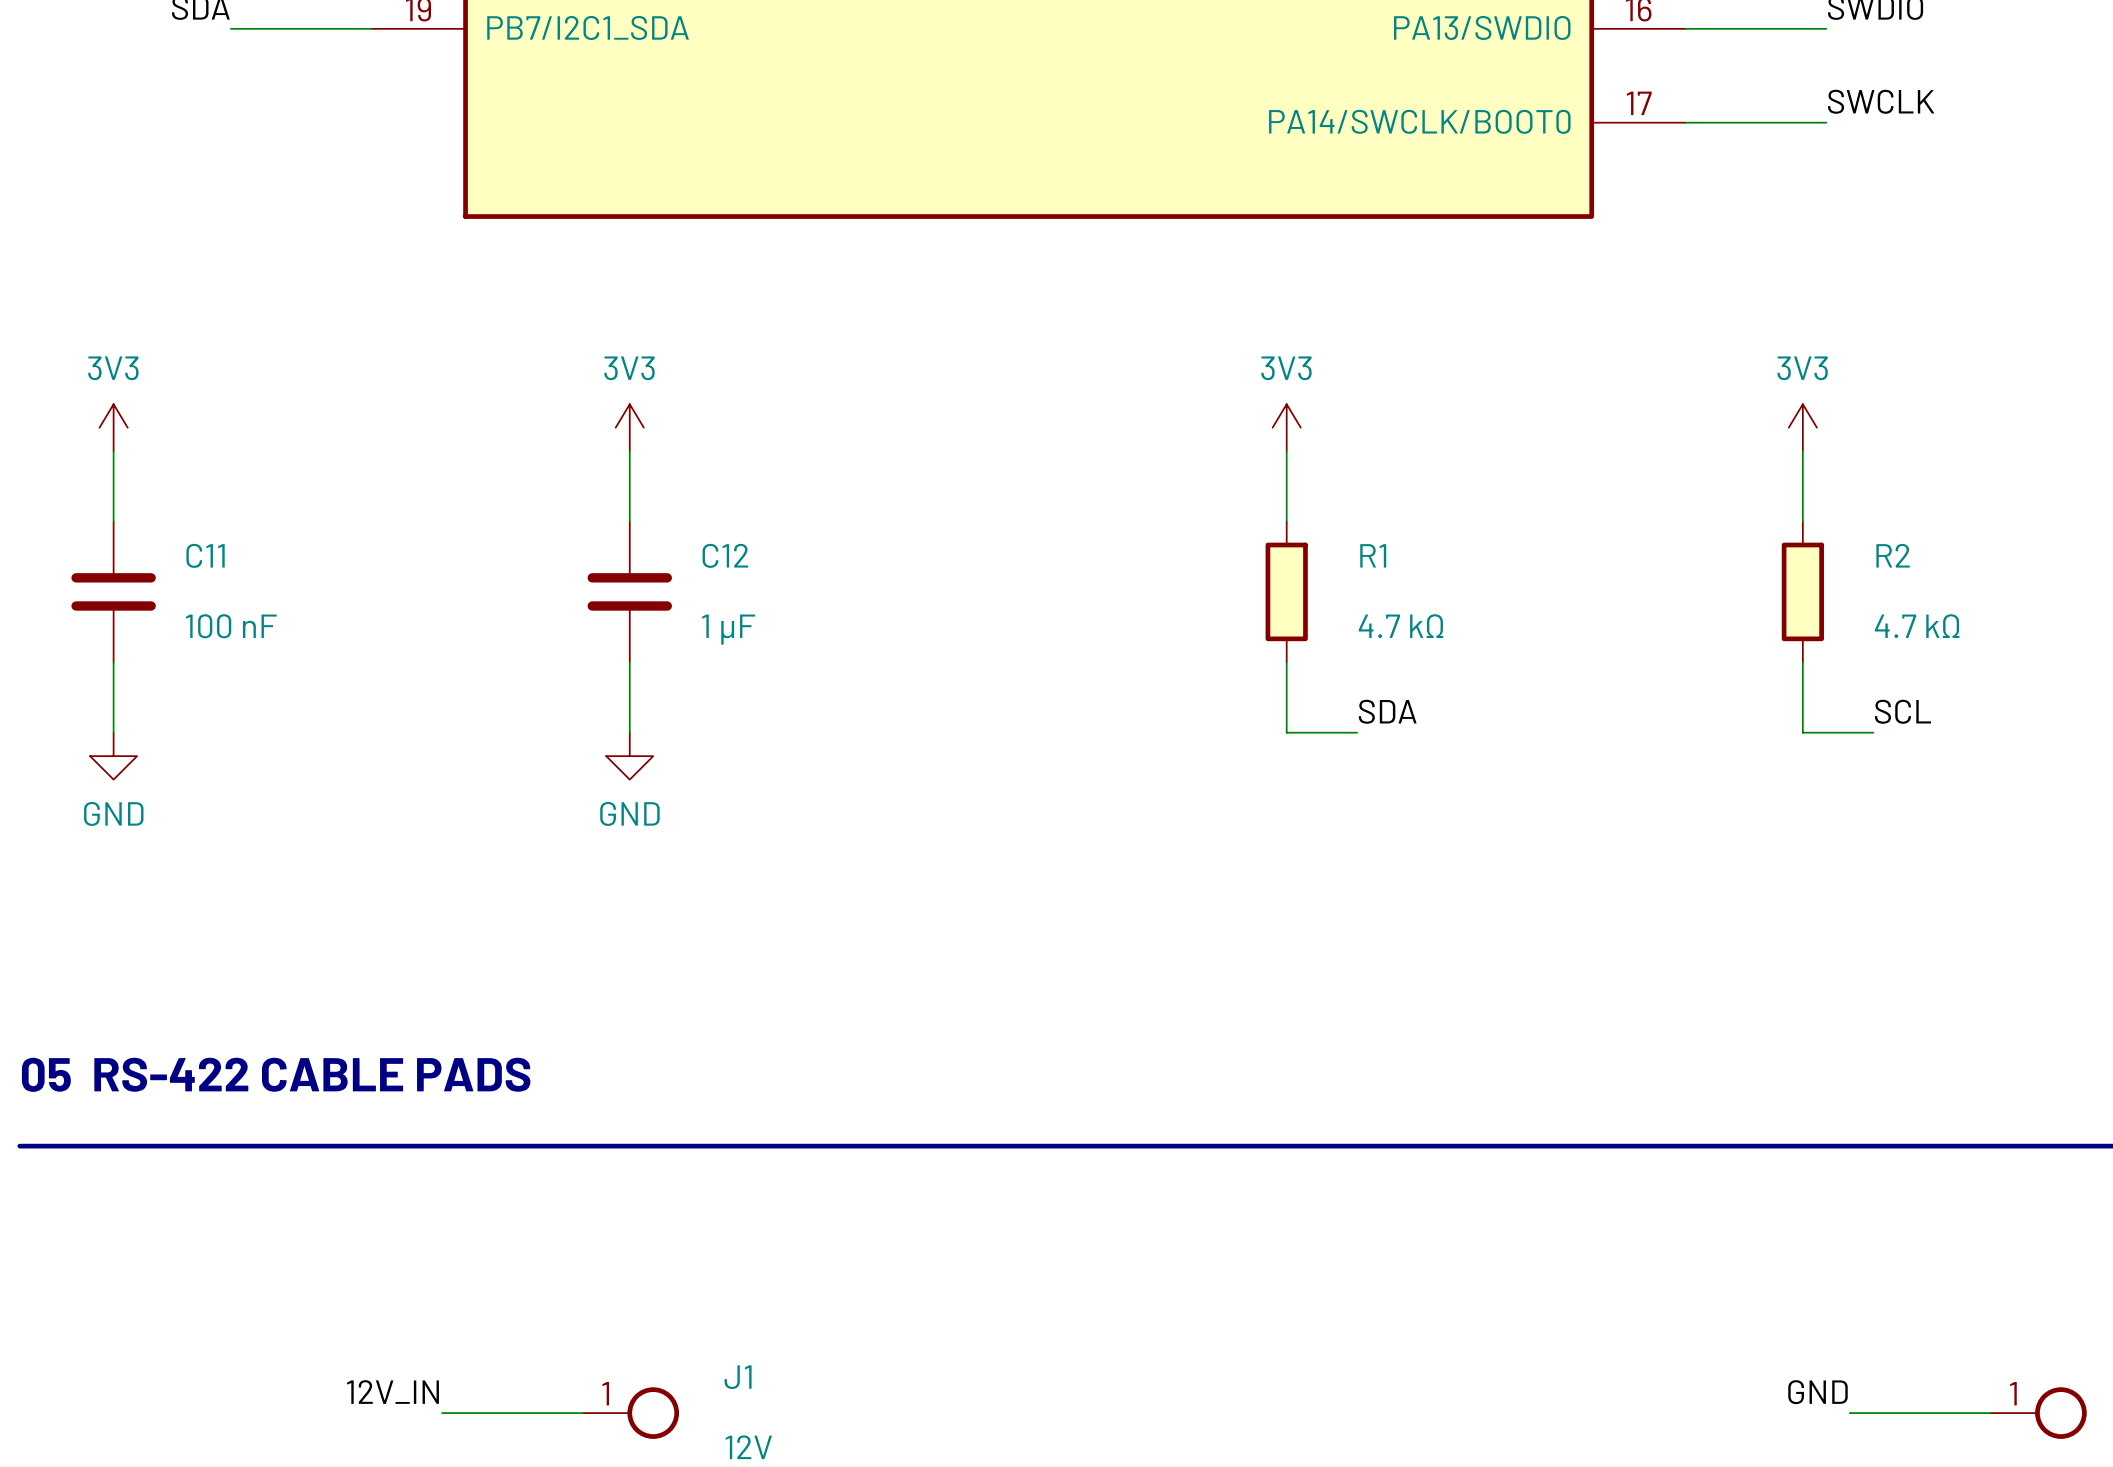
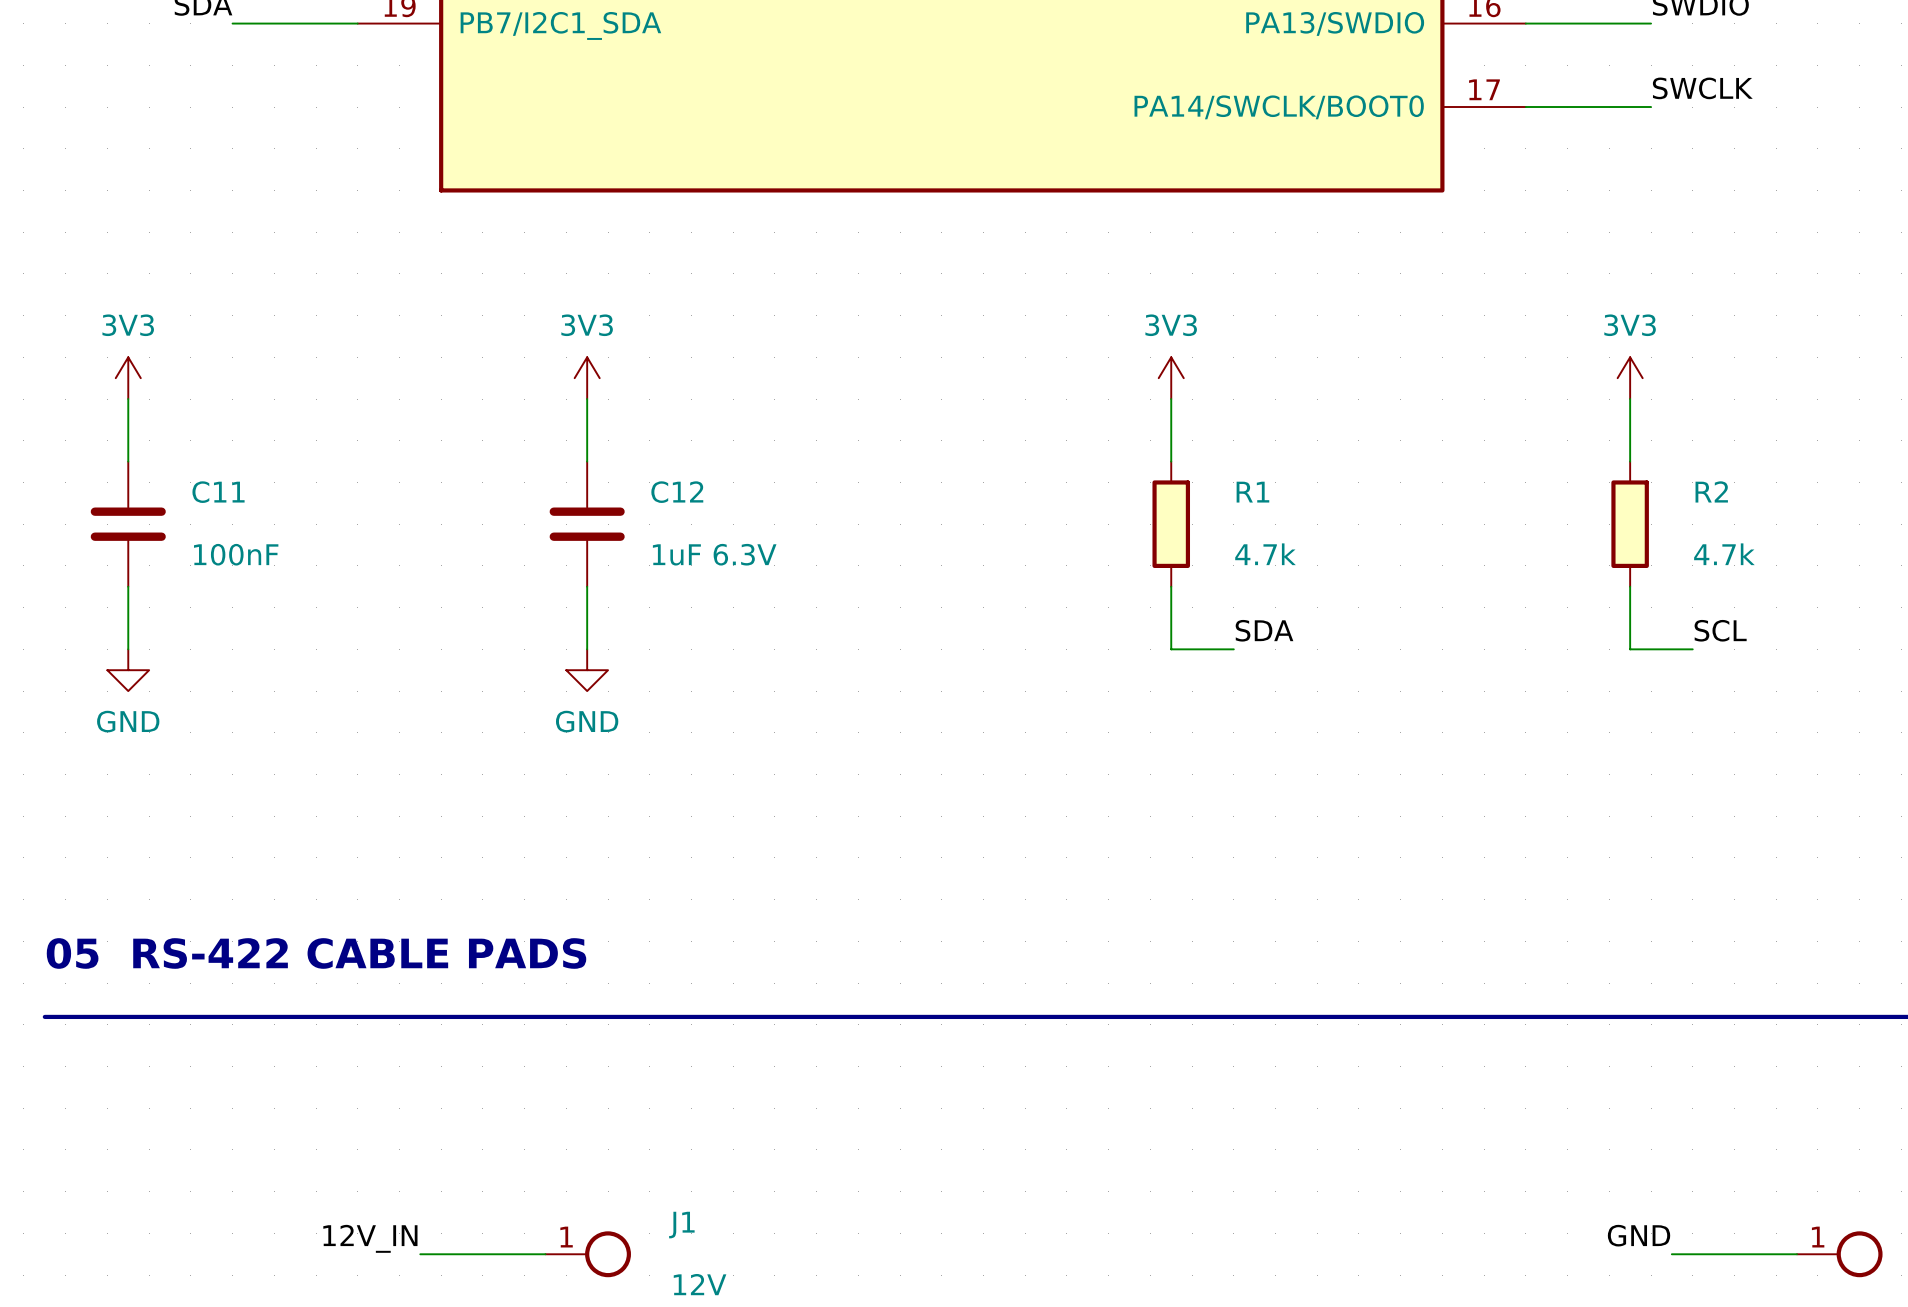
C11 value: 100 nF (231, 626) -> 100nF (236, 554)
R1 value: 4.7 kΩ (1401, 626) -> 4.7k (1265, 554)
R2 value: 4.7 kΩ (1917, 626) -> 4.7k (1724, 554)
C12 value: 1 µF (728, 629) -> 1uF 6.3V (714, 554)

